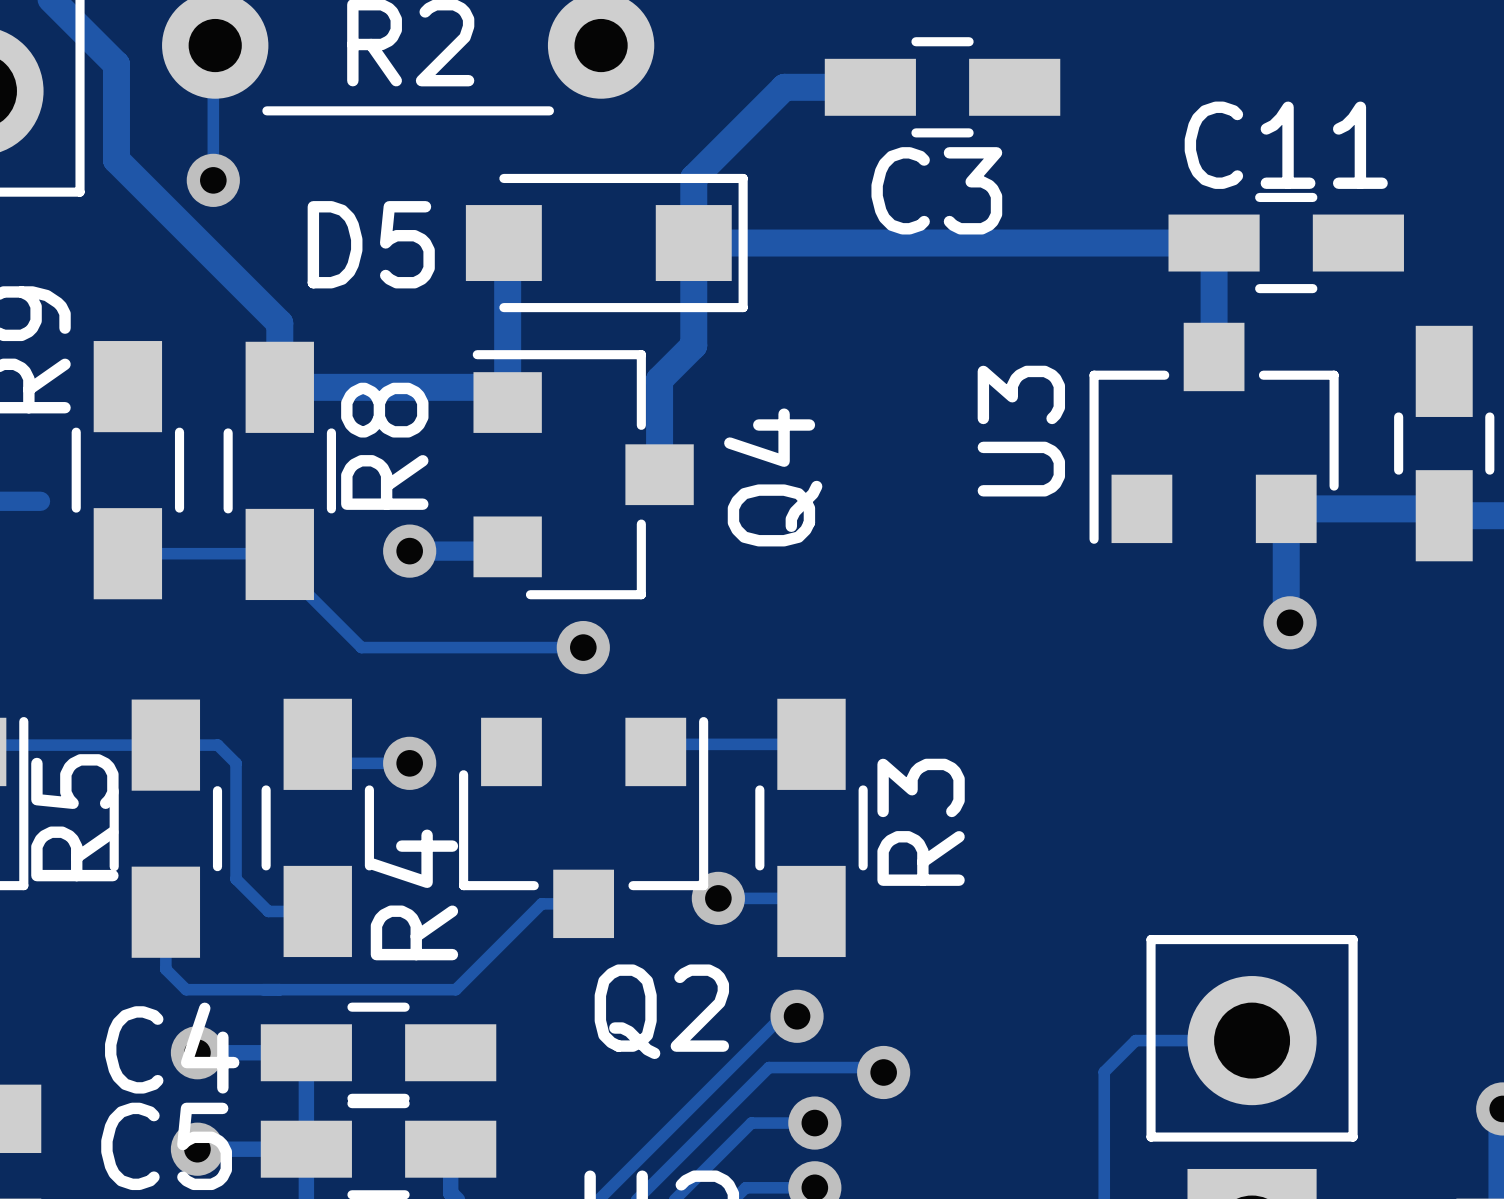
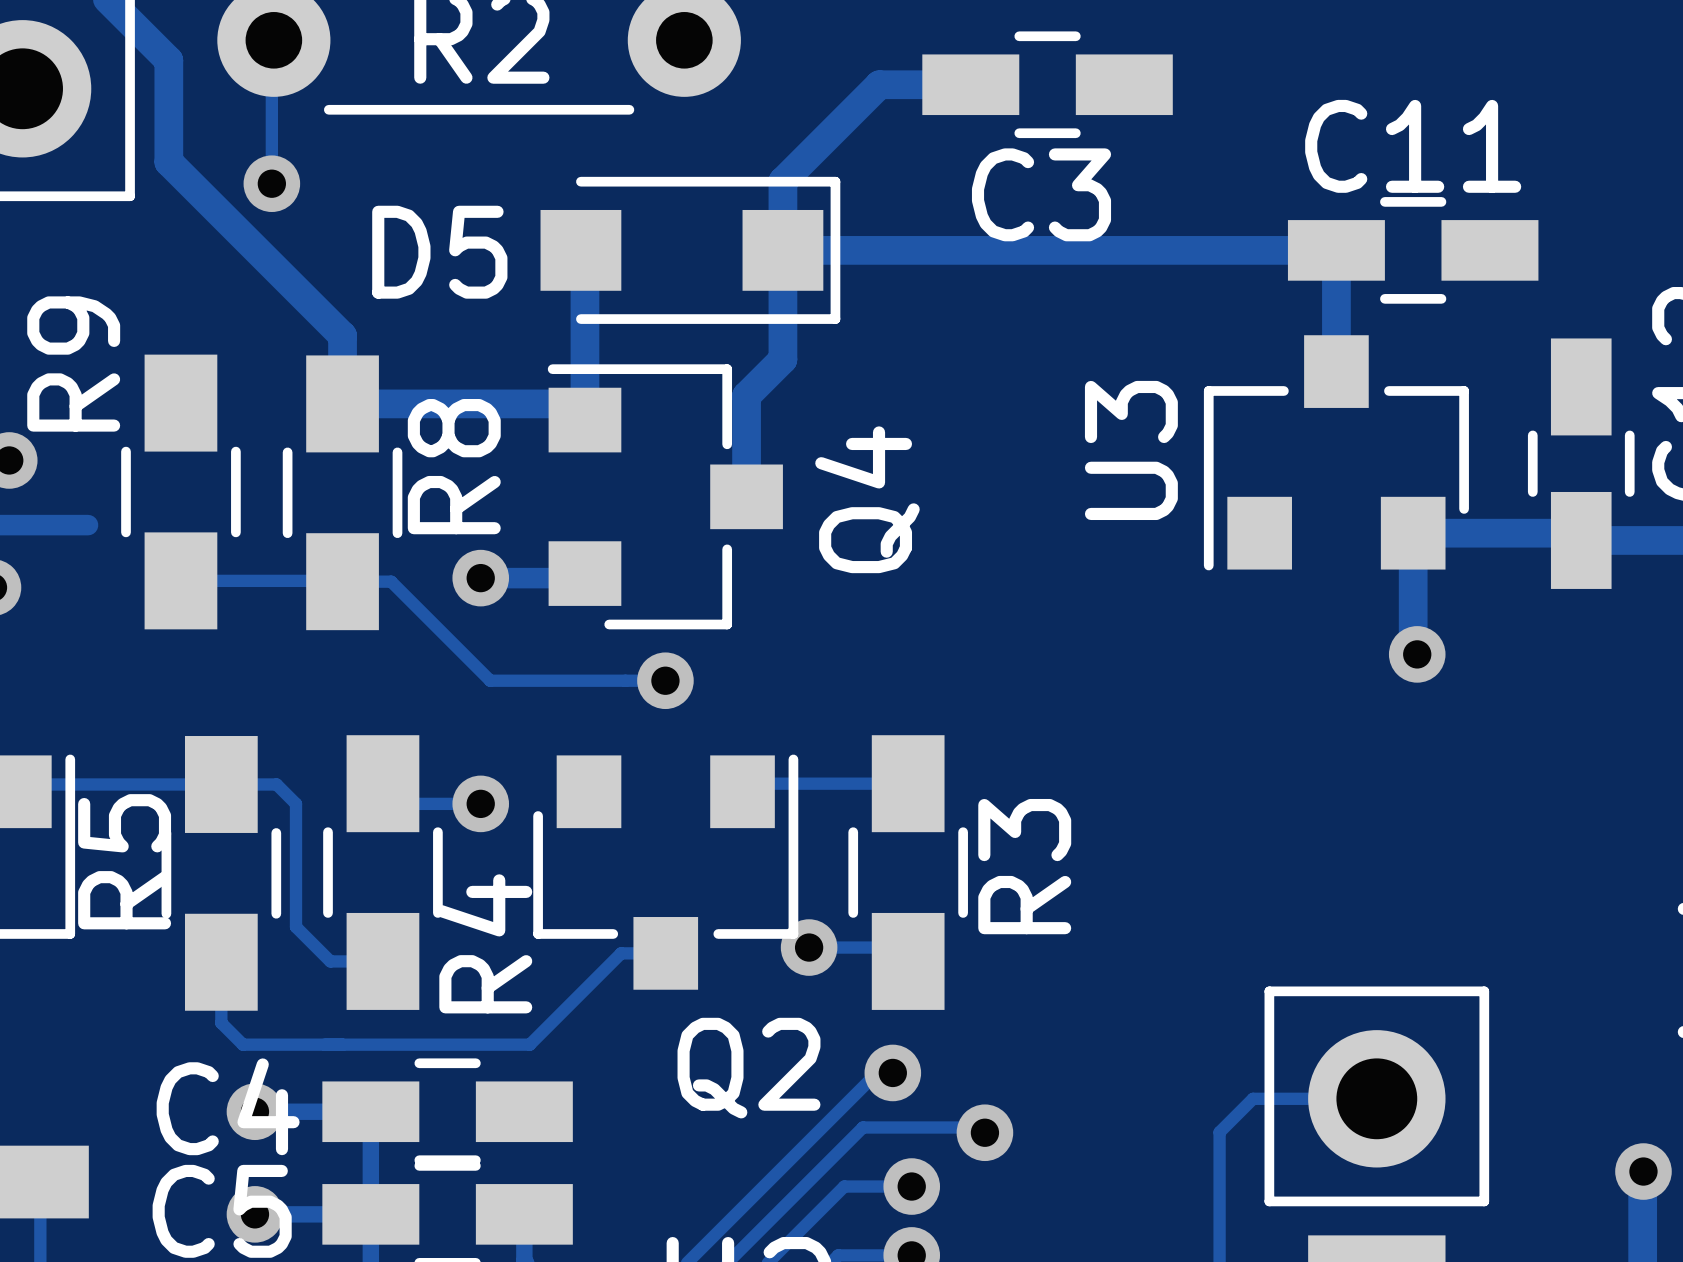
track: (279, 554) (279, 565) (361, 647) (418, 647) -> (342, 581) (391, 581) (490, 680)

